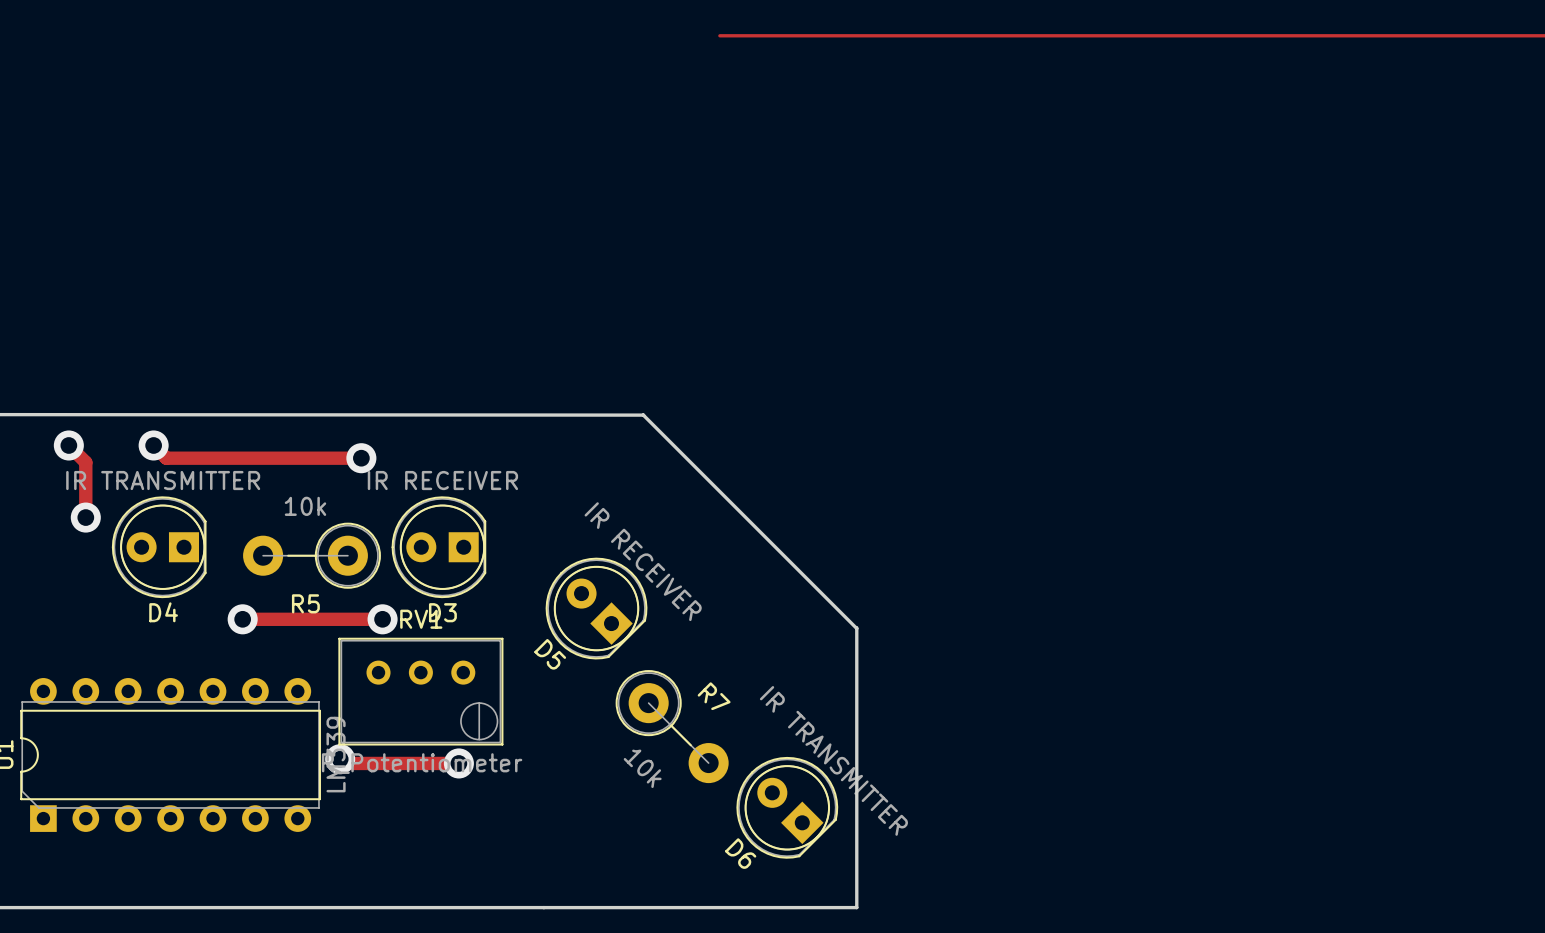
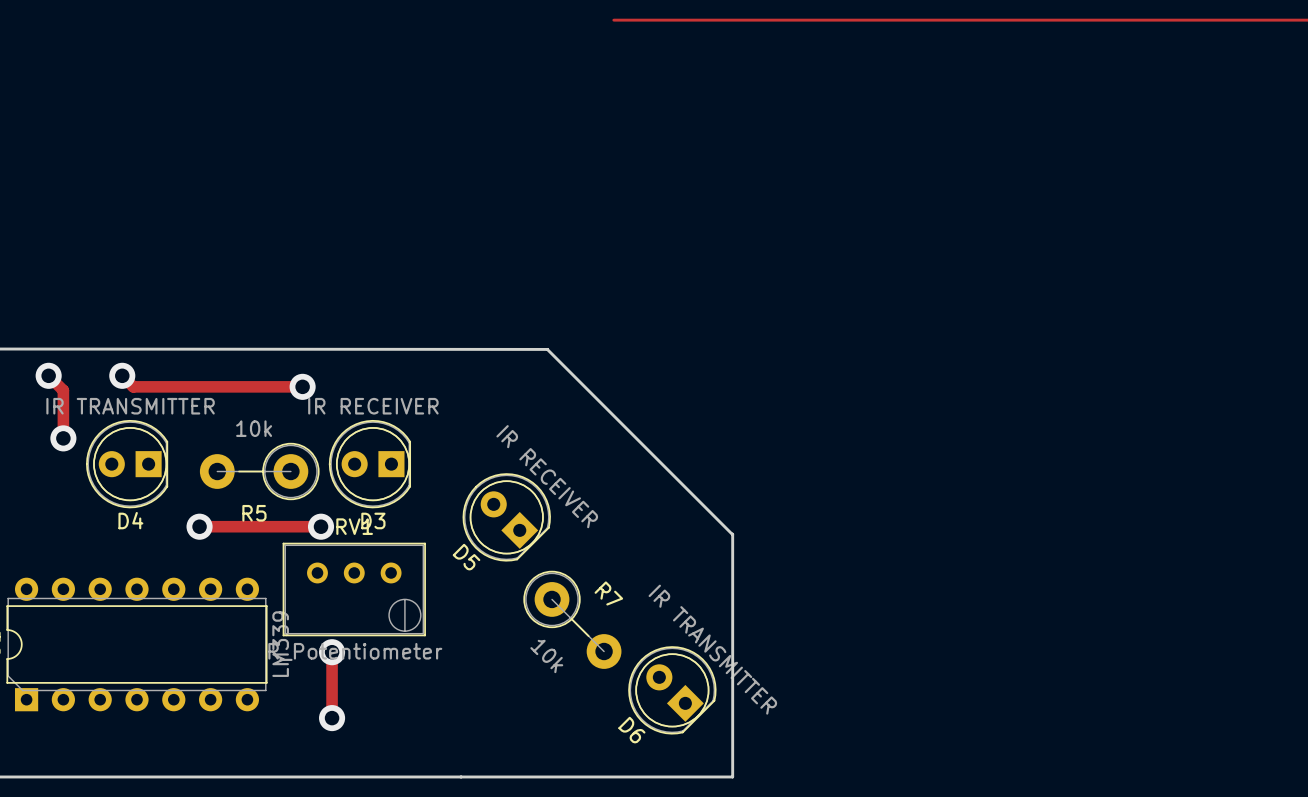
track: (340, 759) (344, 763) (458, 763) -> none
via: (340, 759) -> none
track: none -> (332, 652) (332, 718)
via: none -> (332, 652)
via: (458, 763) -> none
via: none -> (332, 718)

